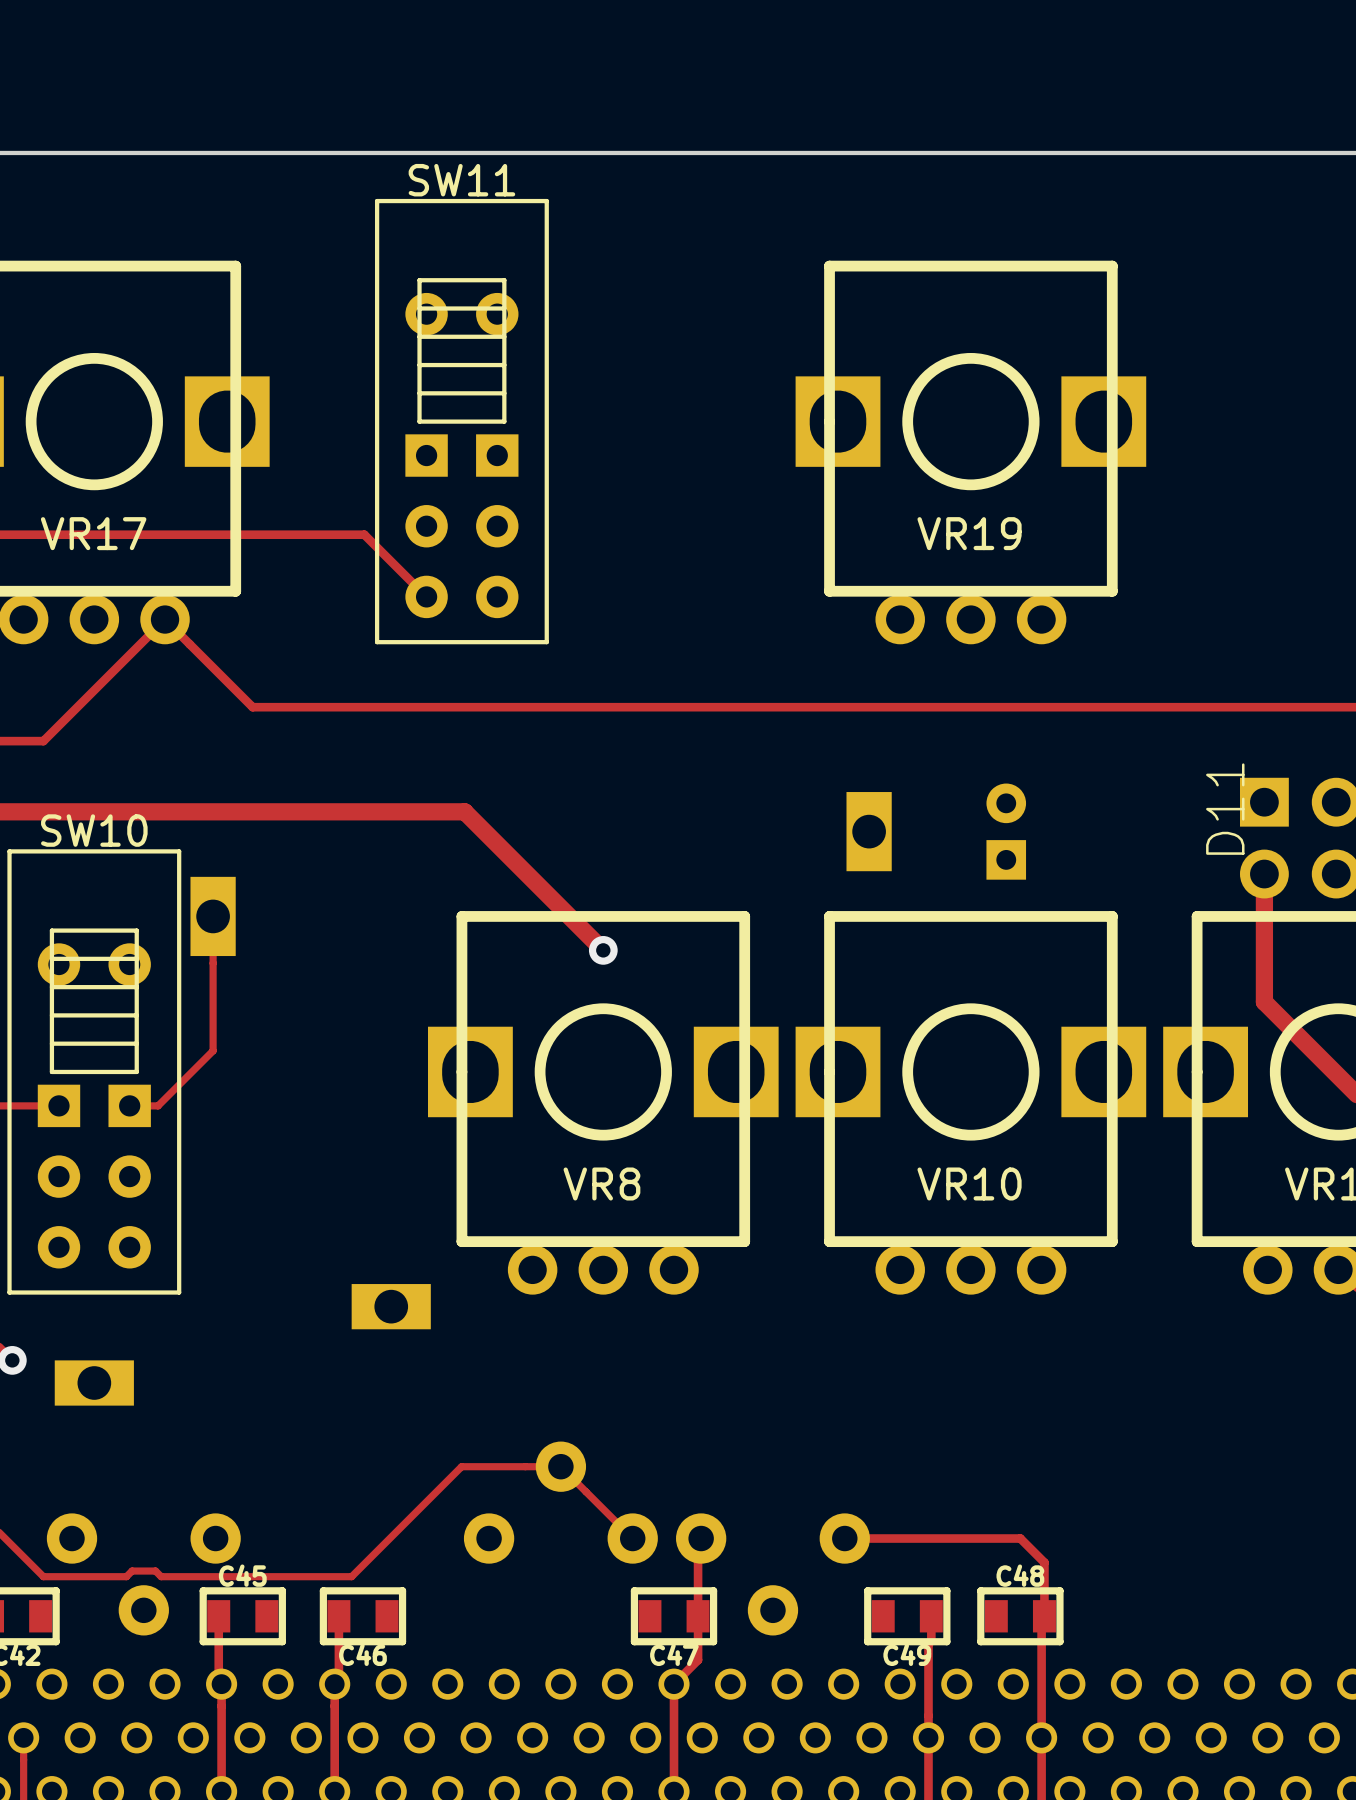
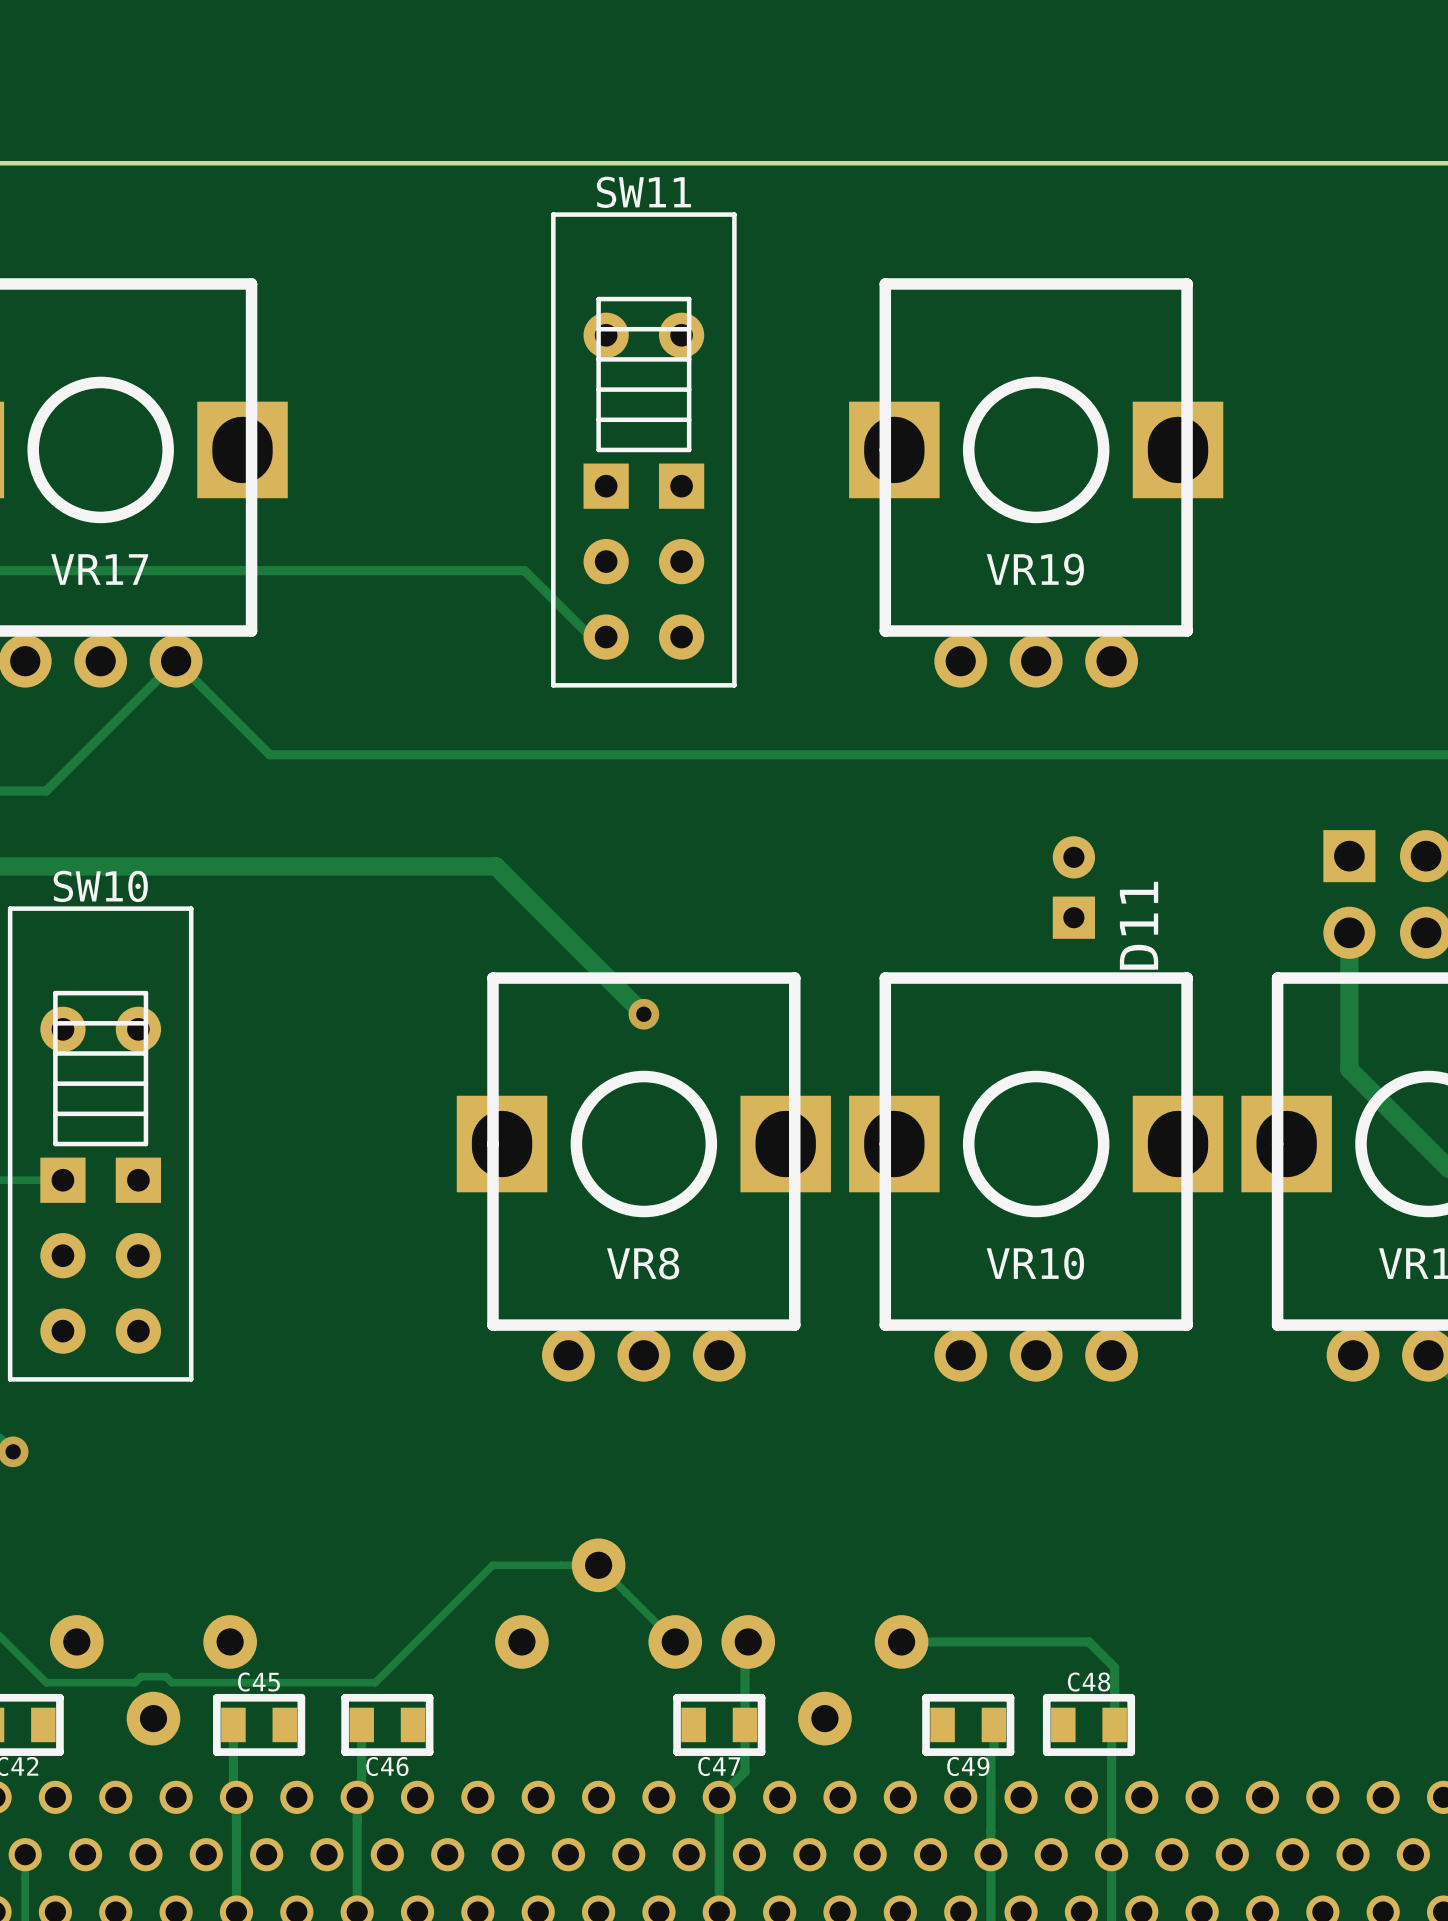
SW11 position: (461, 421) -> (643, 449)
track: (364, 534) (426, 596) -> (388, 570) (524, 570) (591, 637)
D11 position: (1225, 809) -> (1139, 925)
part: (869, 831) -> none
track: (213, 916) (213, 1050) (158, 1105) (129, 1105) -> none
part: (213, 916) -> none
part: (391, 1306) -> none
part: (94, 1383) -> none

